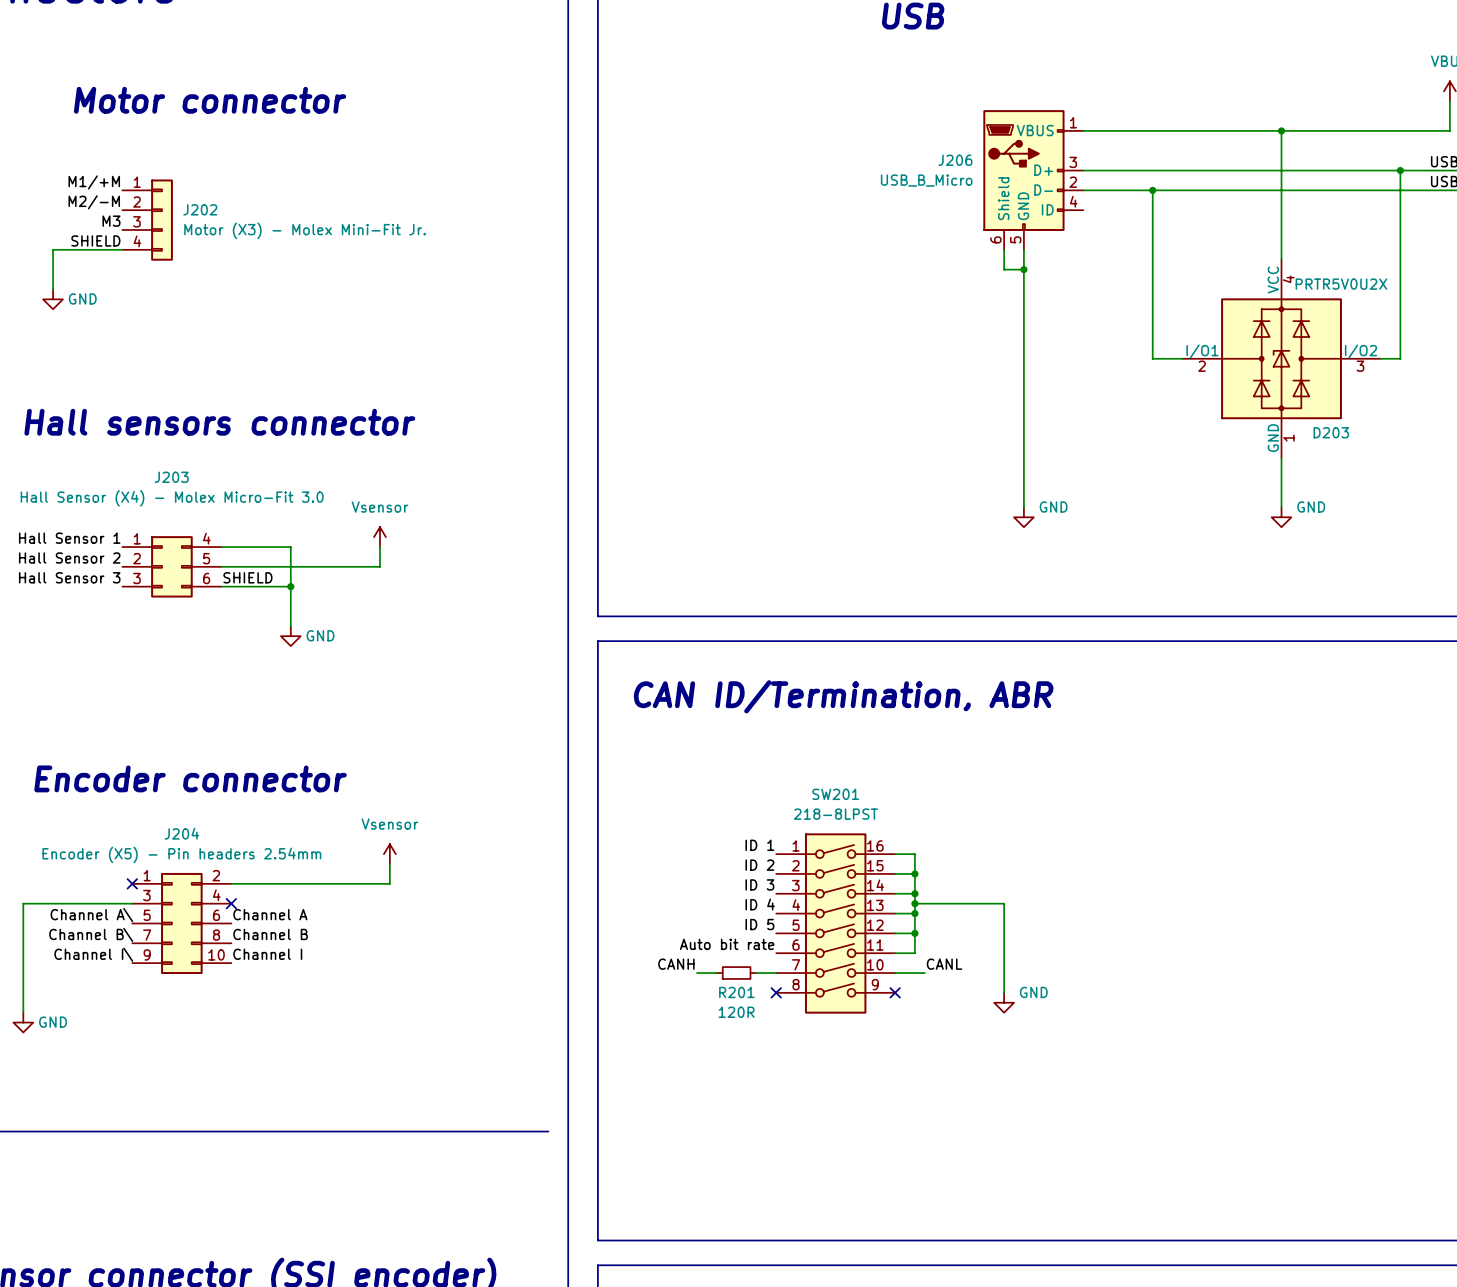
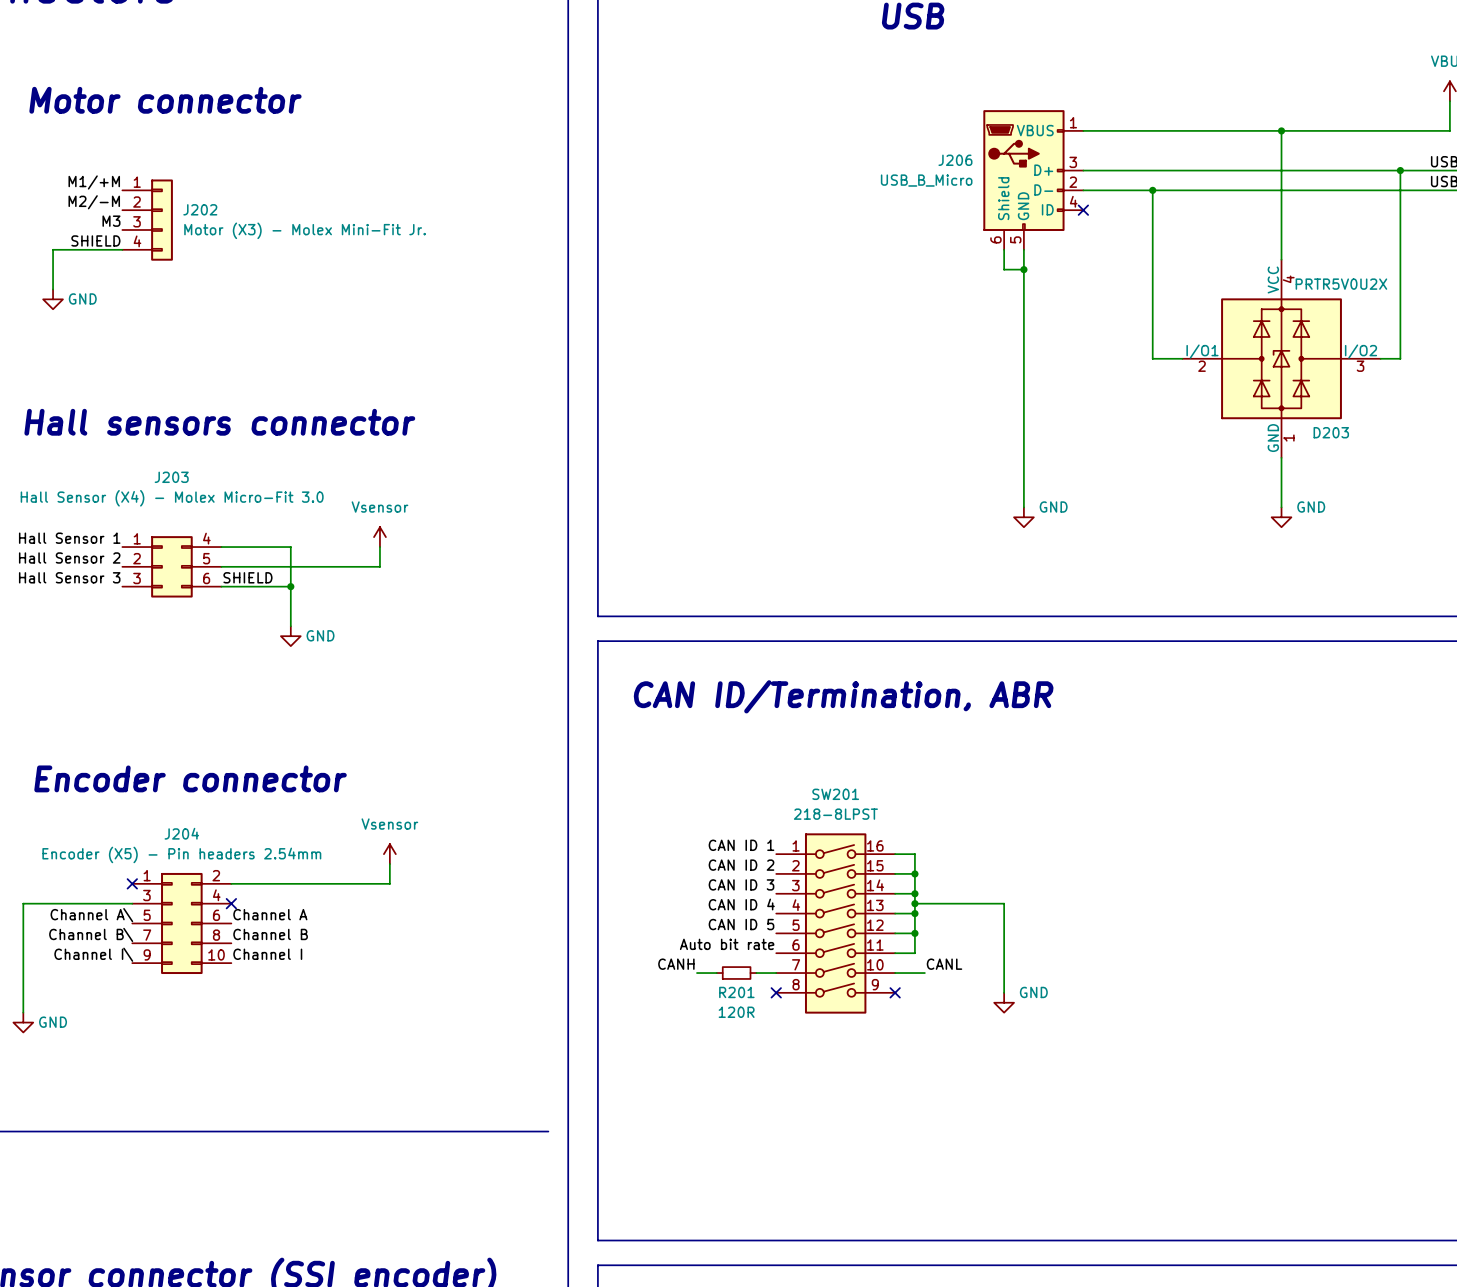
text position: Motor connector (210, 100) -> Motor connector (165, 100)
no-connect mark: none -> (1083, 210)
label: ID 1 (759, 845) -> CAN ID 1 (741, 845)
label: ID 2 (759, 865) -> CAN ID 2 (741, 865)
label: ID 3 (759, 884) -> CAN ID 3 (741, 884)
label: ID 4 (760, 904) -> CAN ID 4 (741, 904)
label: ID 5 (759, 924) -> CAN ID 5 (741, 924)

